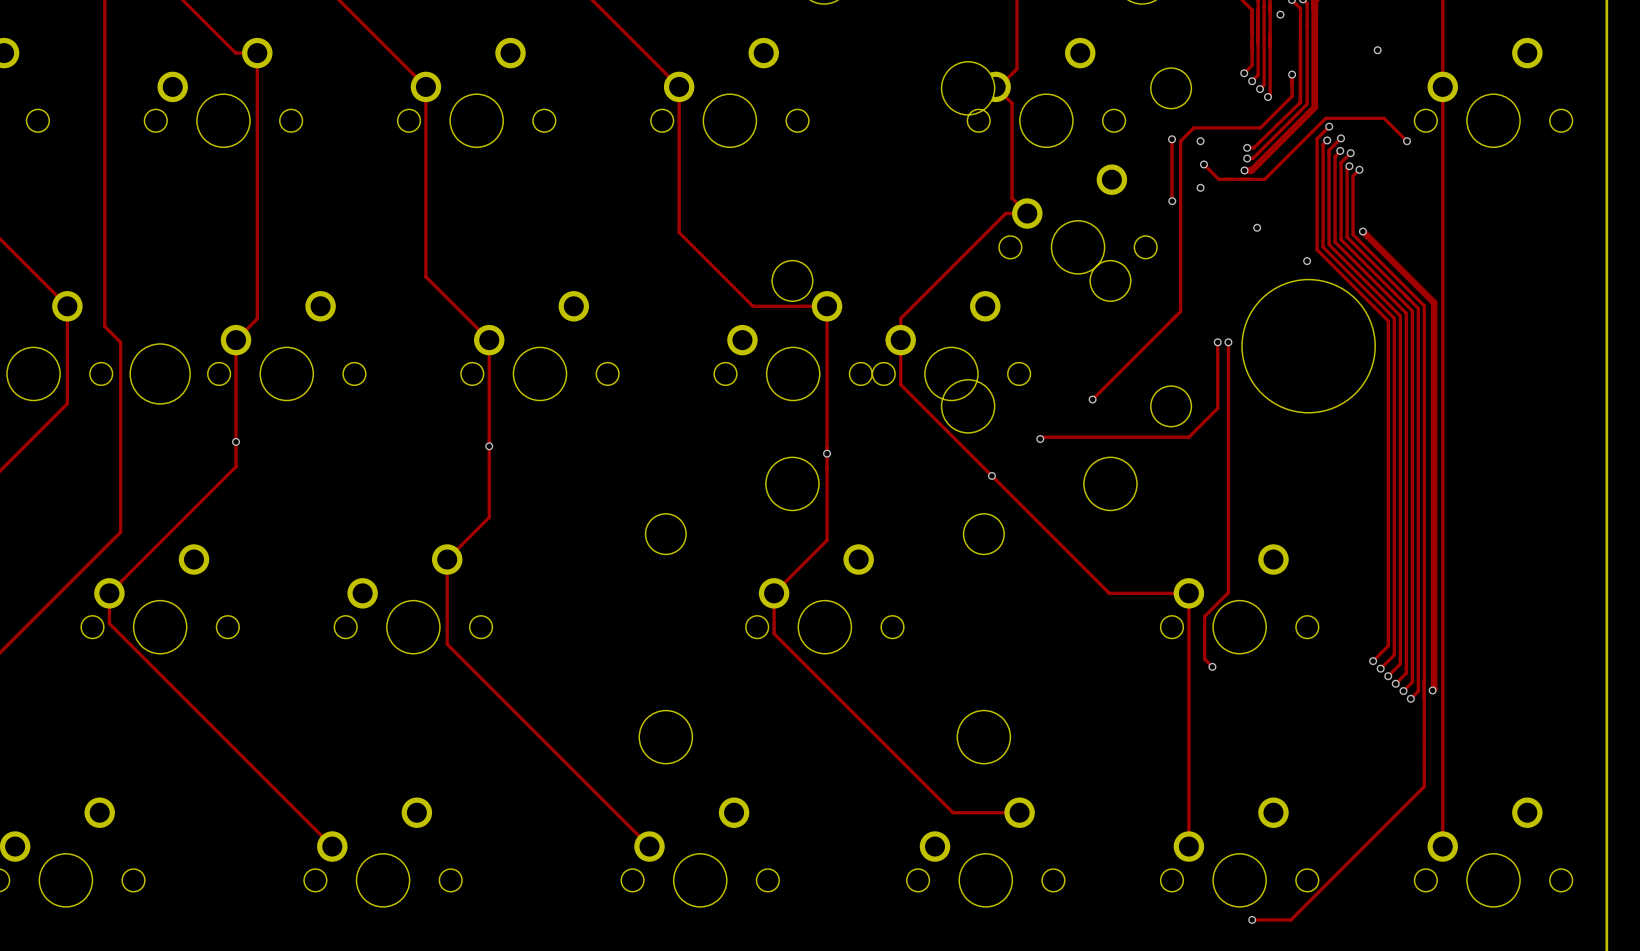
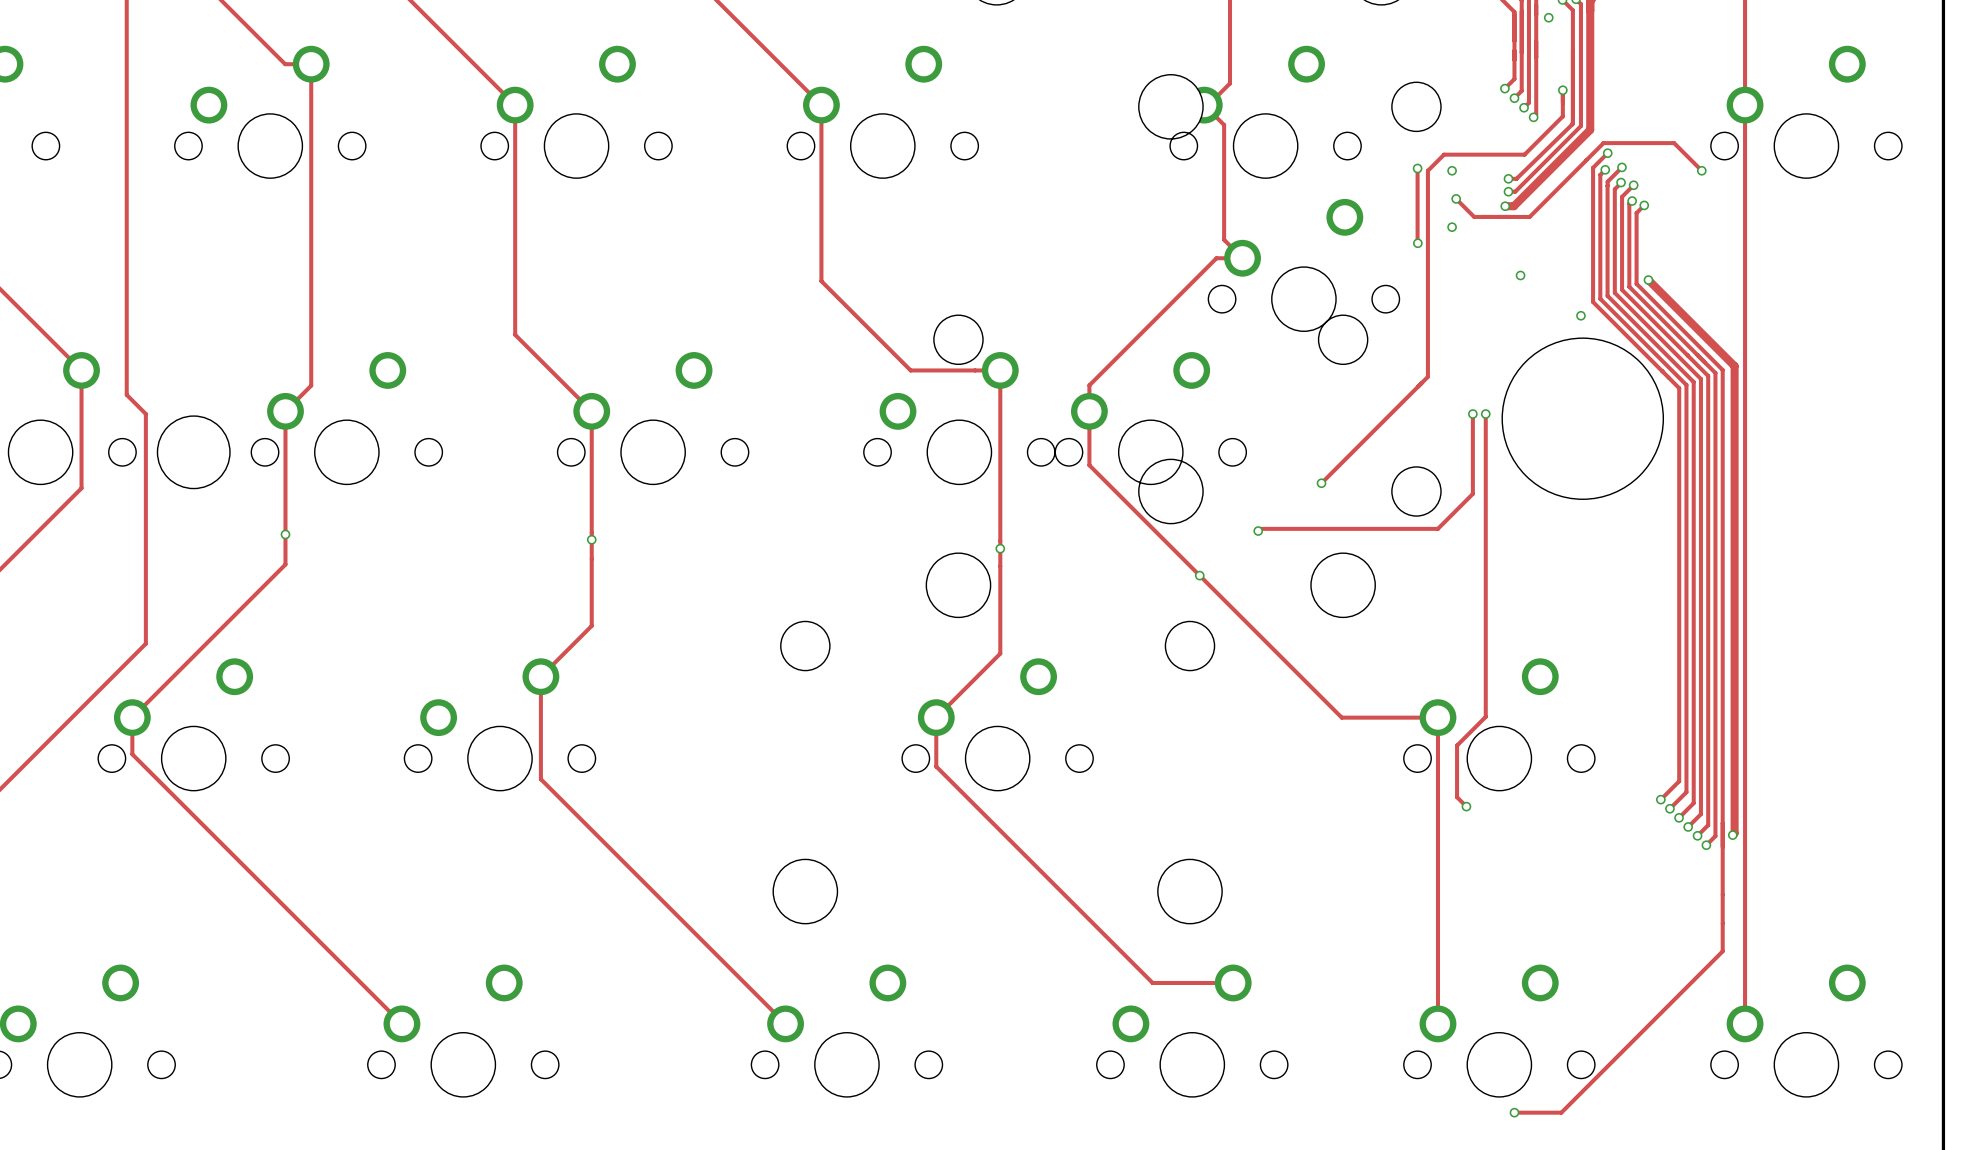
via: (1377, 50) -> none

